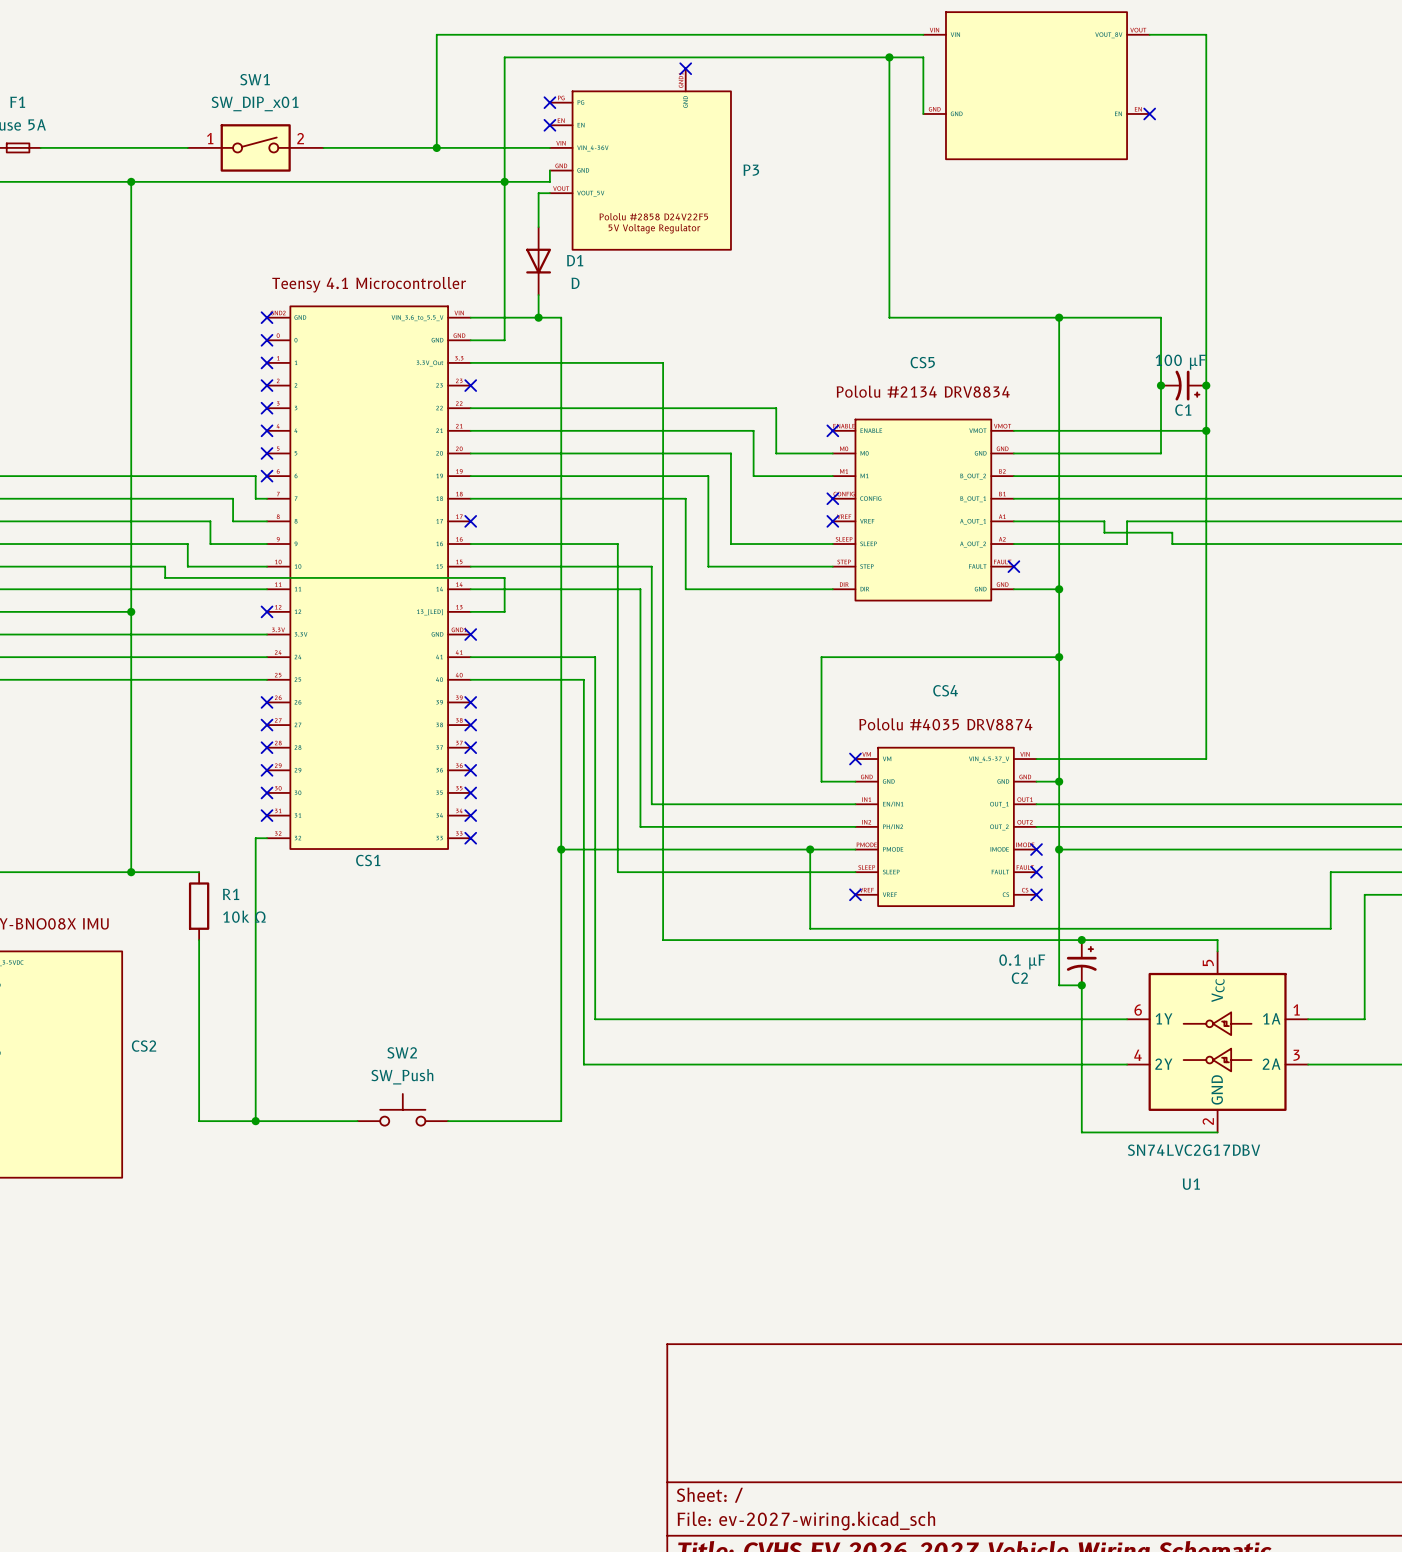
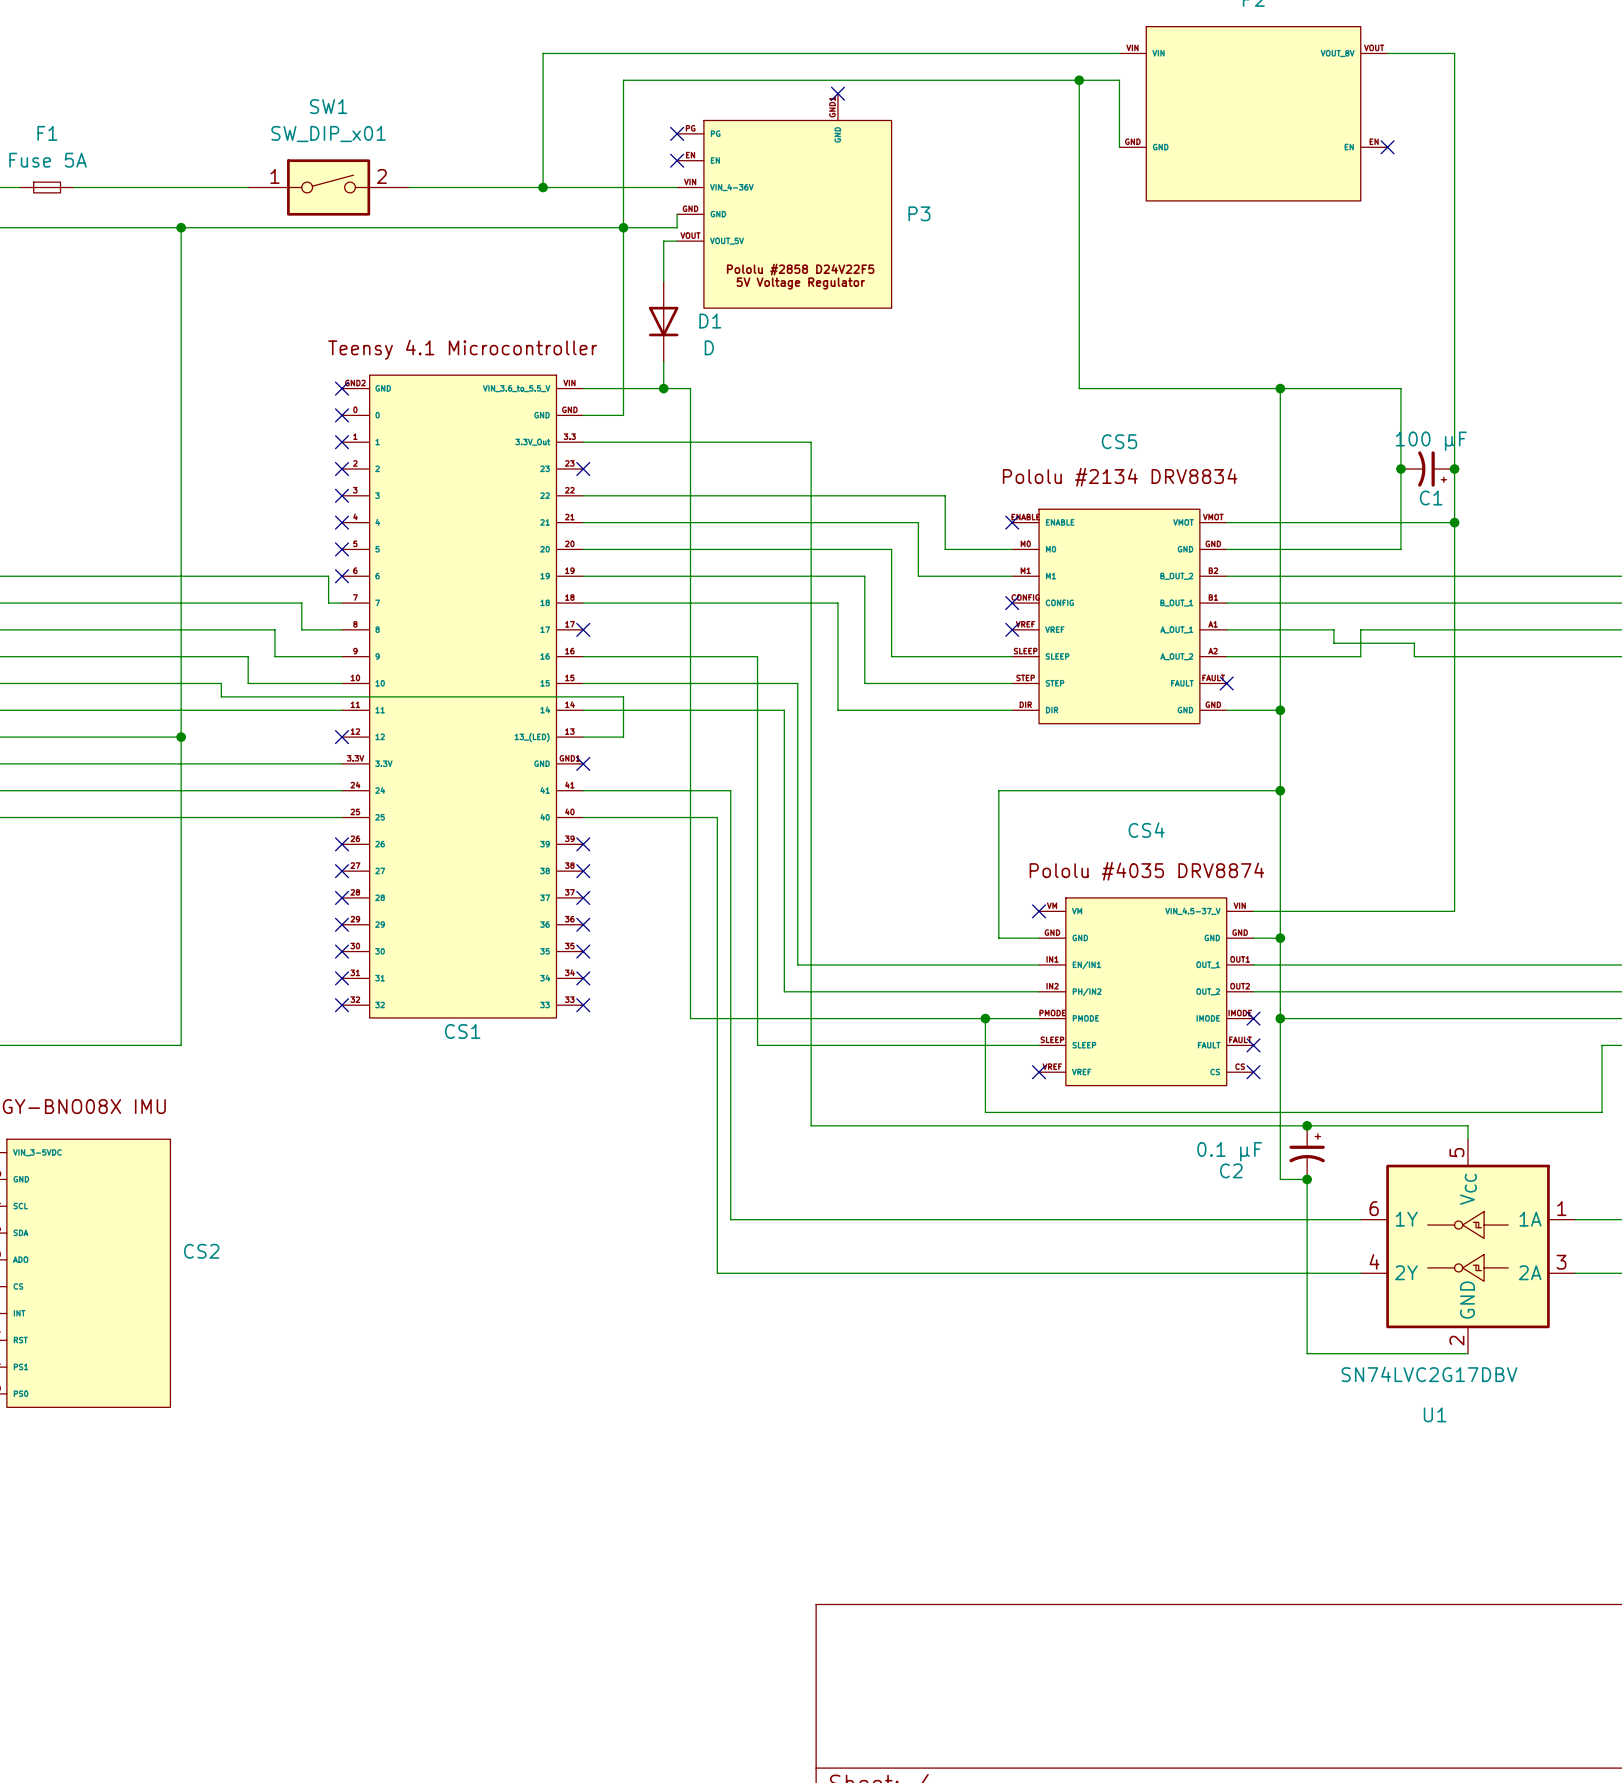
wire: (267, 838) (255, 838) (255, 1121) -> none
no-connect mark: none -> (342, 1005)
wire: (561, 849) (561, 1121) (448, 1121) -> none
junction: (561, 849) -> none
wire: (131, 872) (199, 872) -> none
junction: (131, 872) -> none
R1: 10k Ω (199, 906) -> none
wire: (199, 940) (199, 1121) (357, 1121) -> none
SW2: SW_Push (402, 1109) -> none
junction: (255, 1121) -> none

